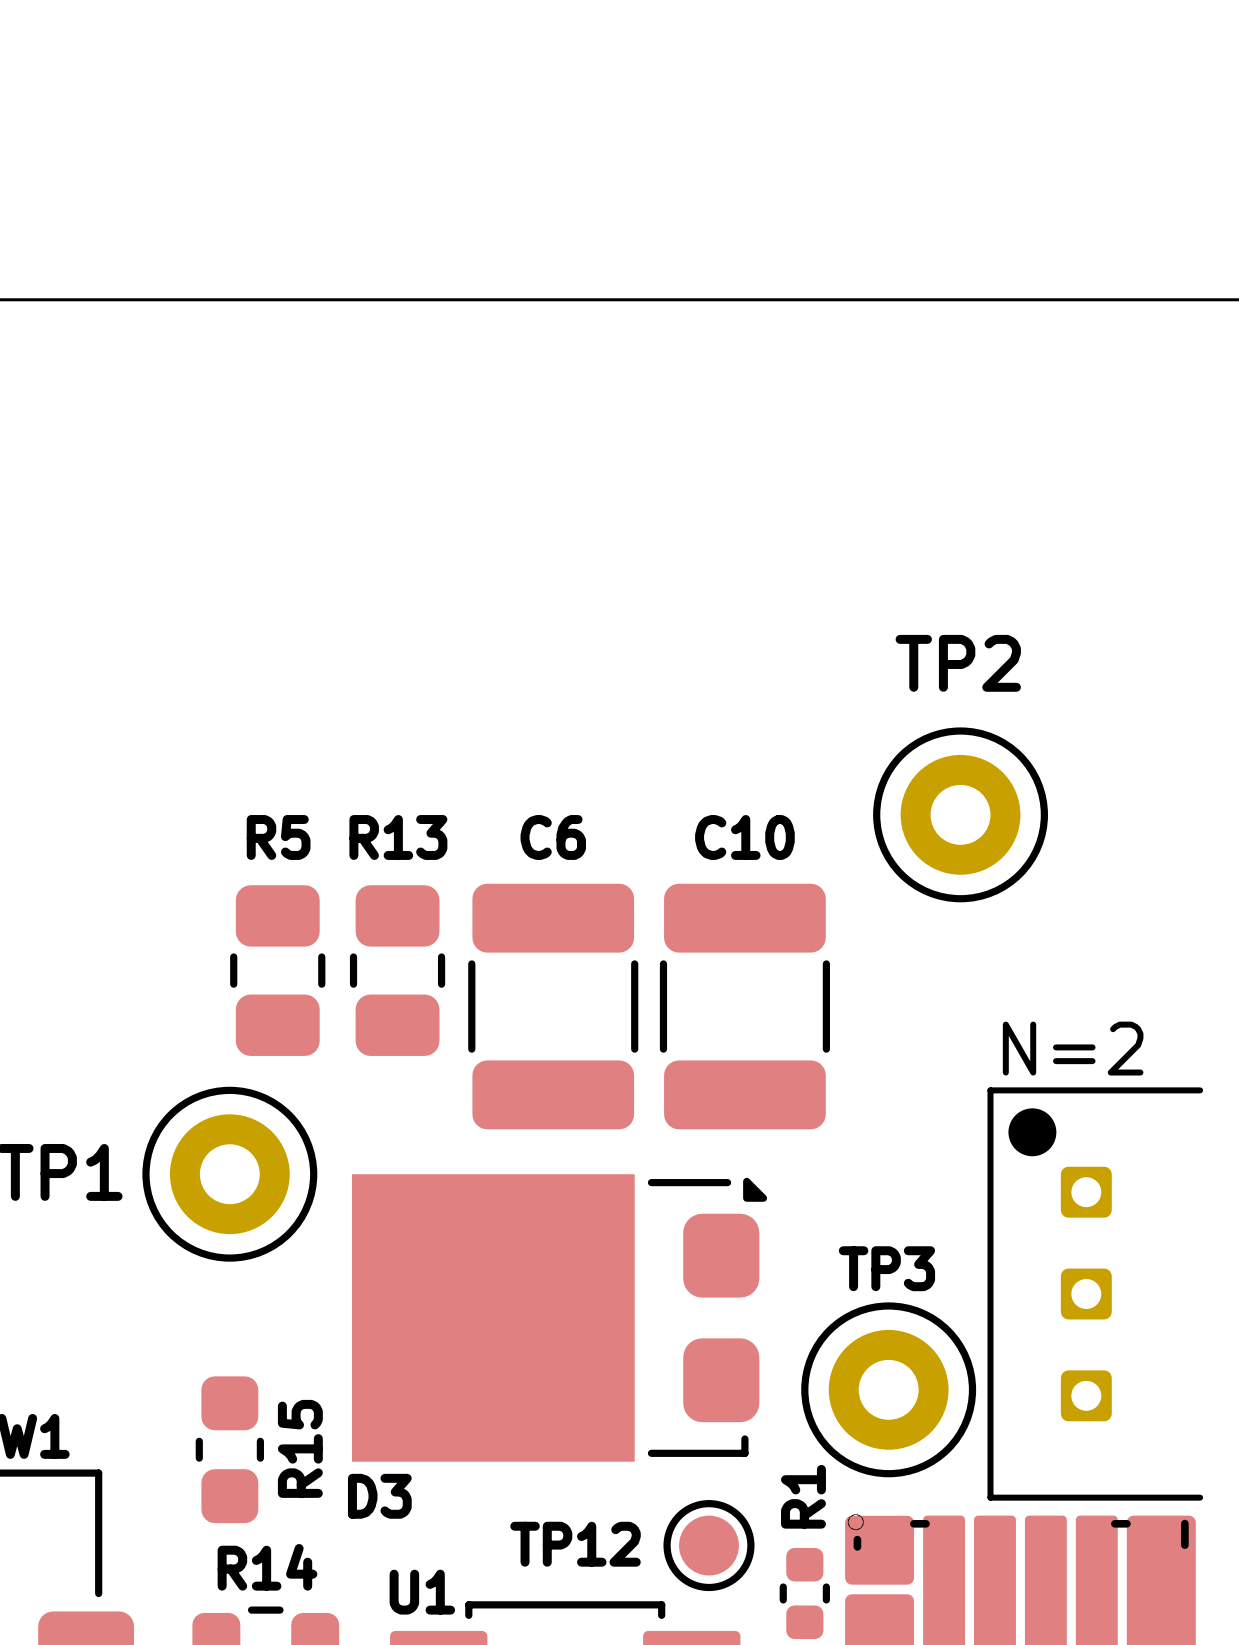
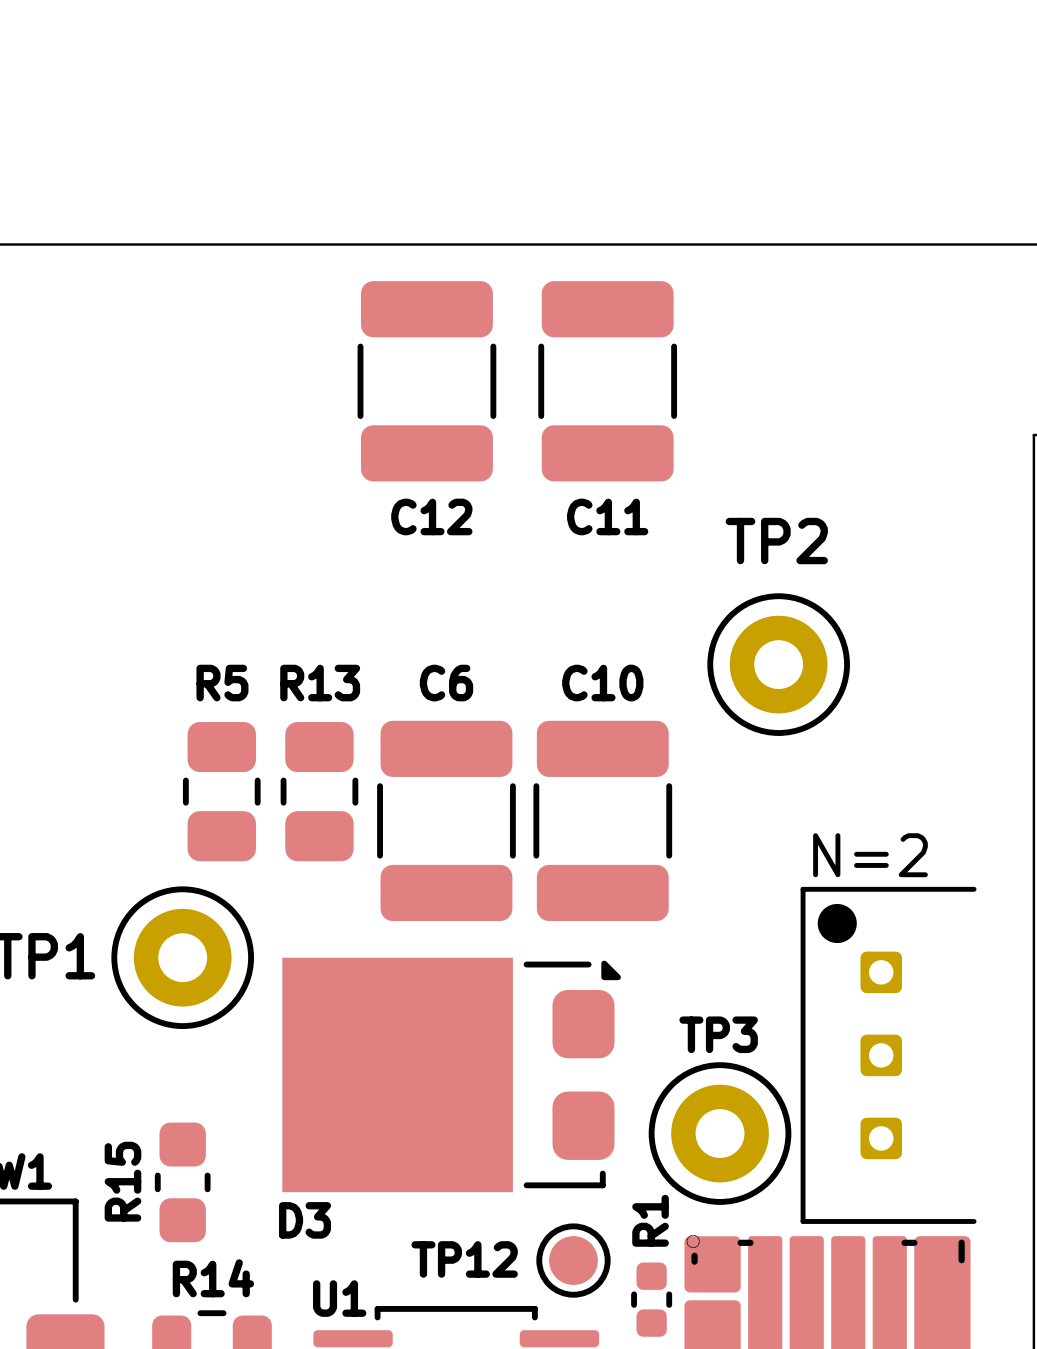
C12: none -> (426, 381)
C11: none -> (607, 381)
R15 name position: R15 (300, 1448) -> R15 (122, 1181)

